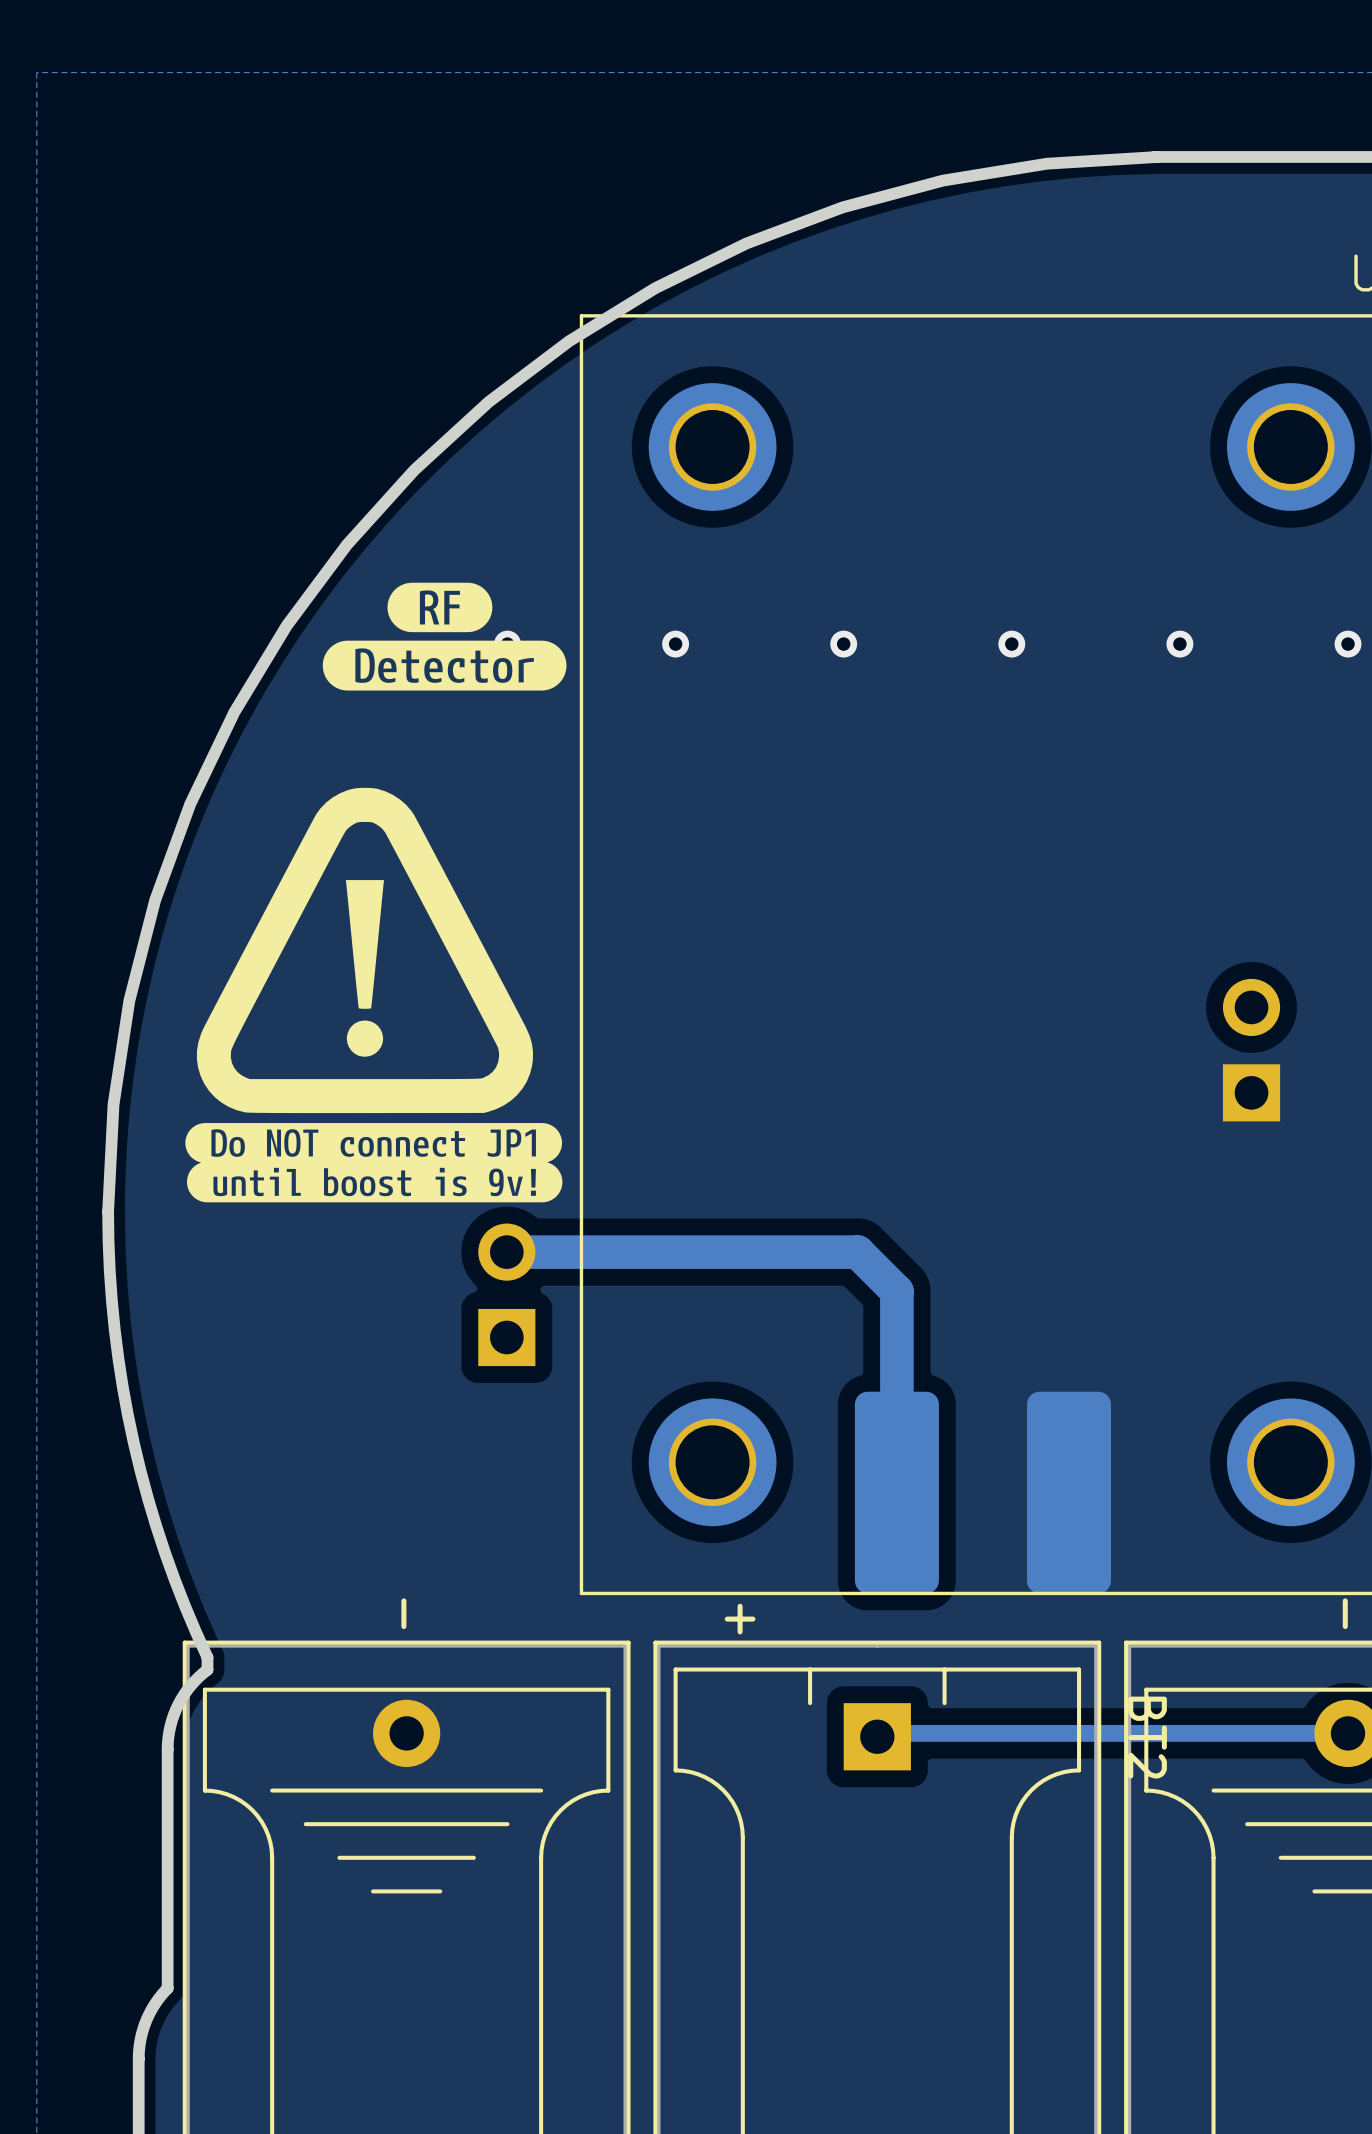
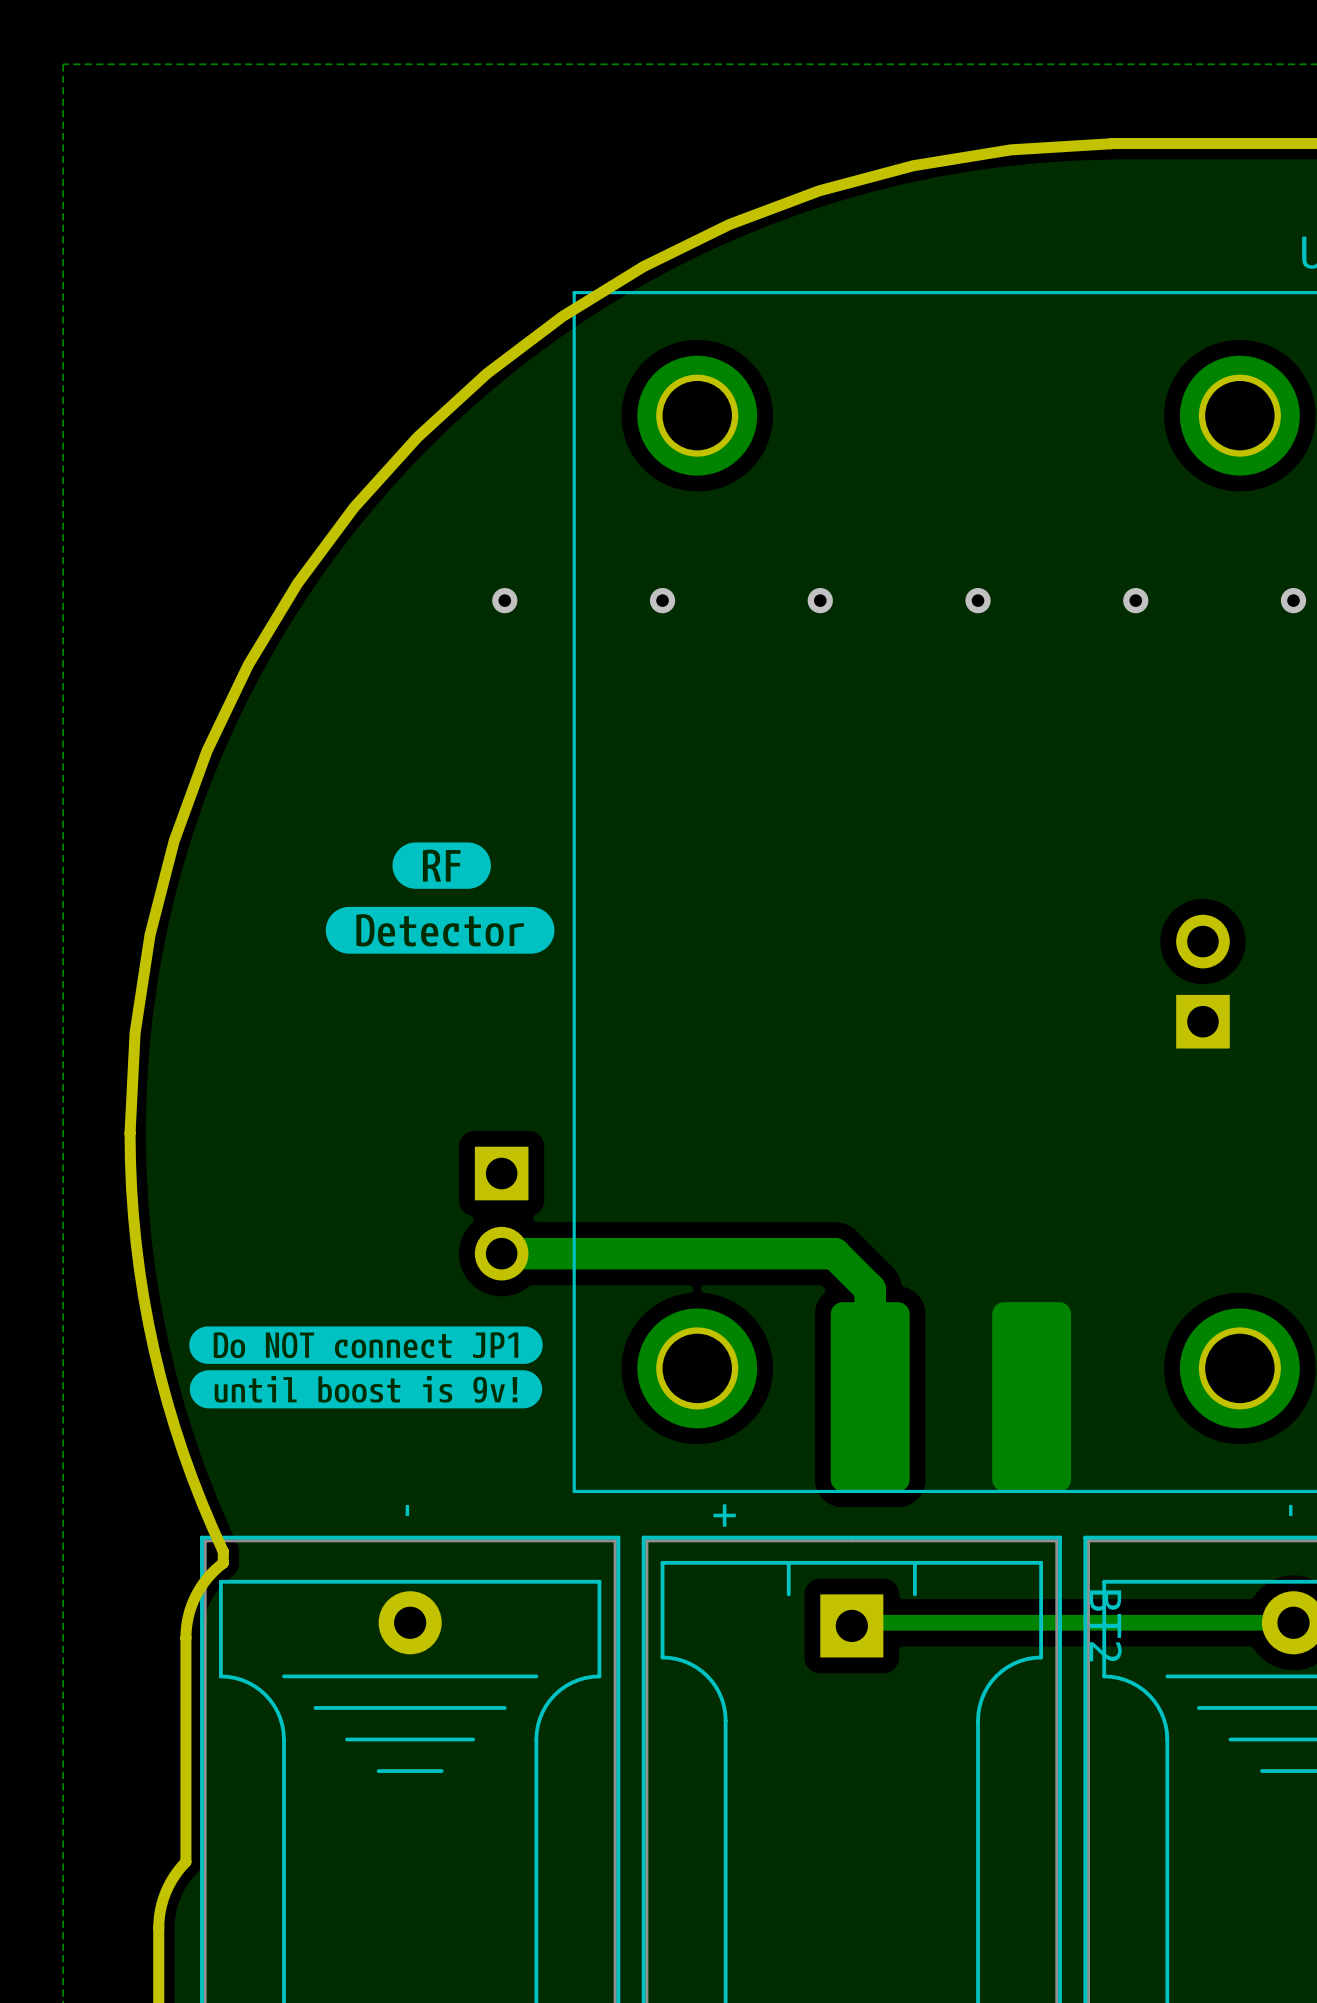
drawing position: (439, 607) -> (441, 865)
drawing position: (444, 665) -> (440, 930)
drawing: [196, 787, 533, 1114] -> none
drawing position: (373, 1143) -> (365, 1345)
drawing position: (374, 1182) -> (365, 1389)
track: (506, 1252) (857, 1252) (896, 1291) (896, 1378) -> (501, 1253) (834, 1253) (870, 1289)
part rotation: 0° (506, 1294) -> 180° (501, 1213)

